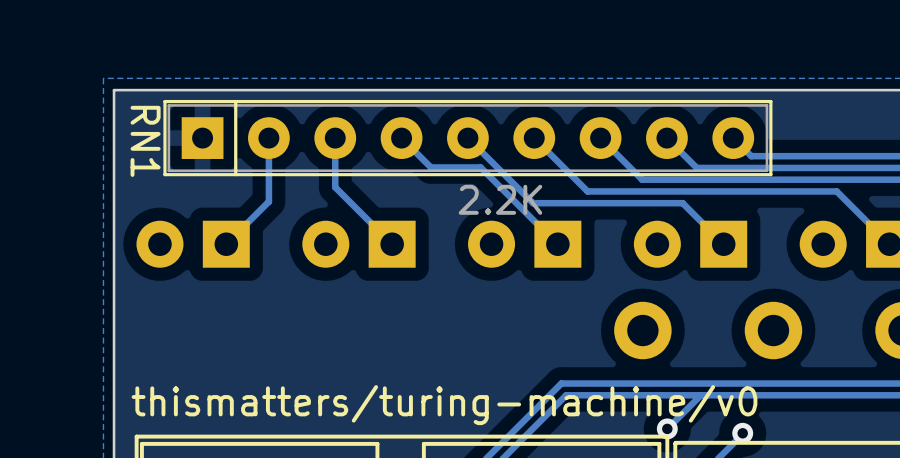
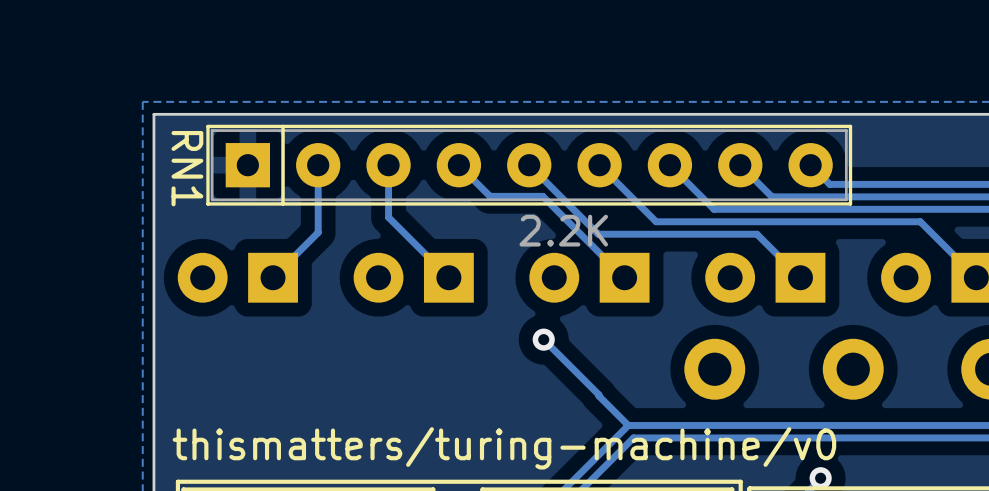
track: none -> (543, 339) (628, 425)
via: none -> (543, 339)
track: (700, 395) (667, 428) -> none
via: (667, 428) -> none

